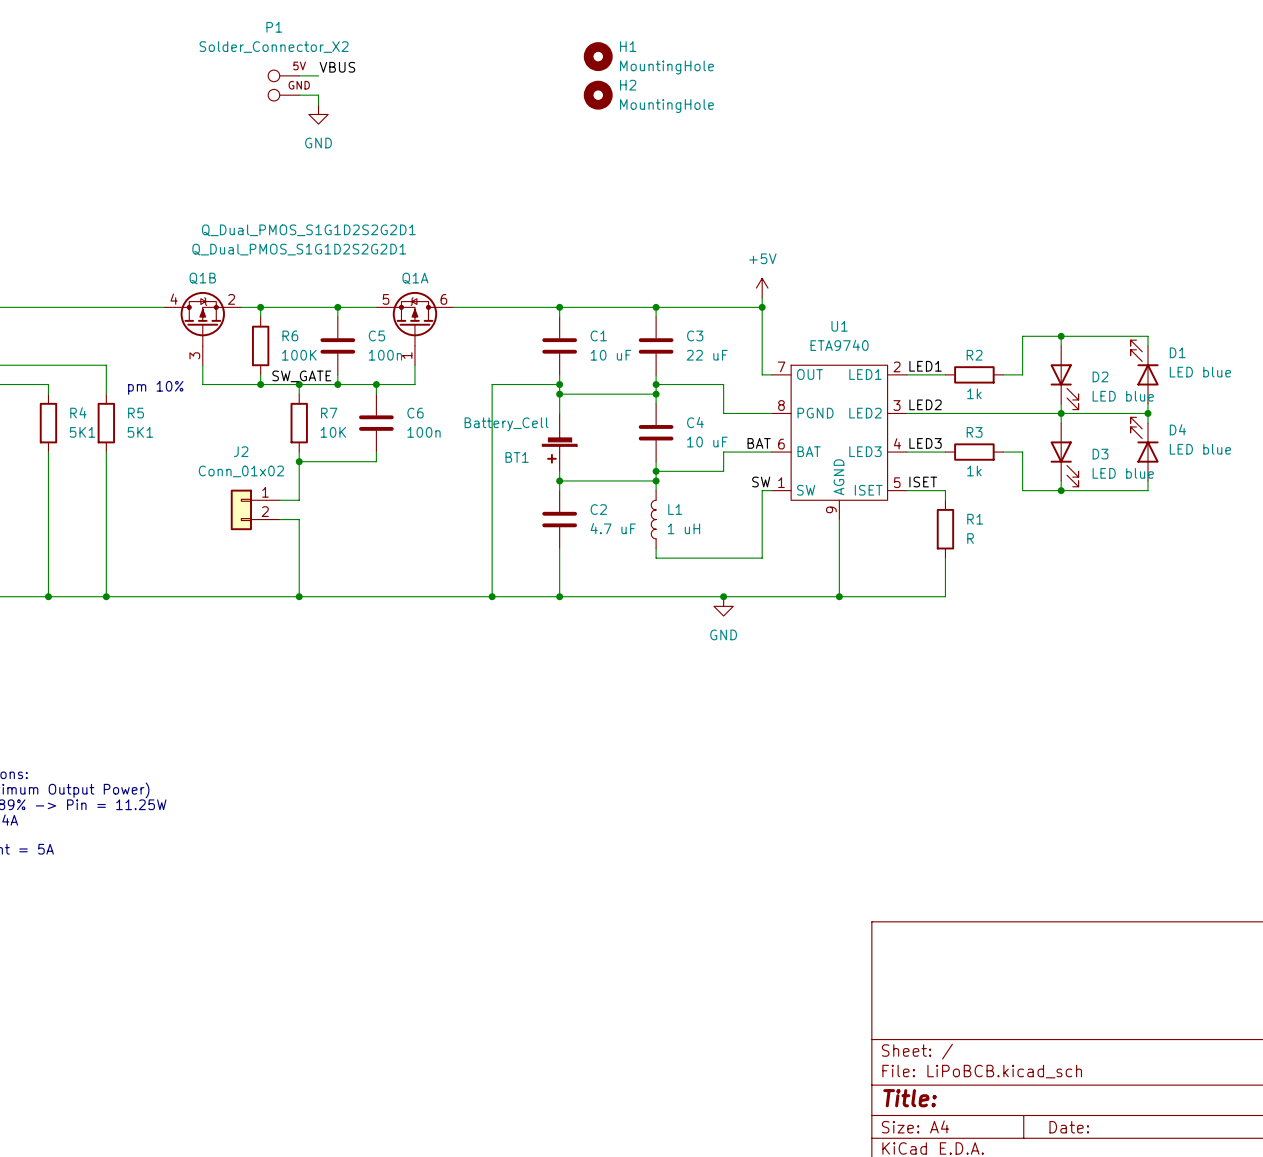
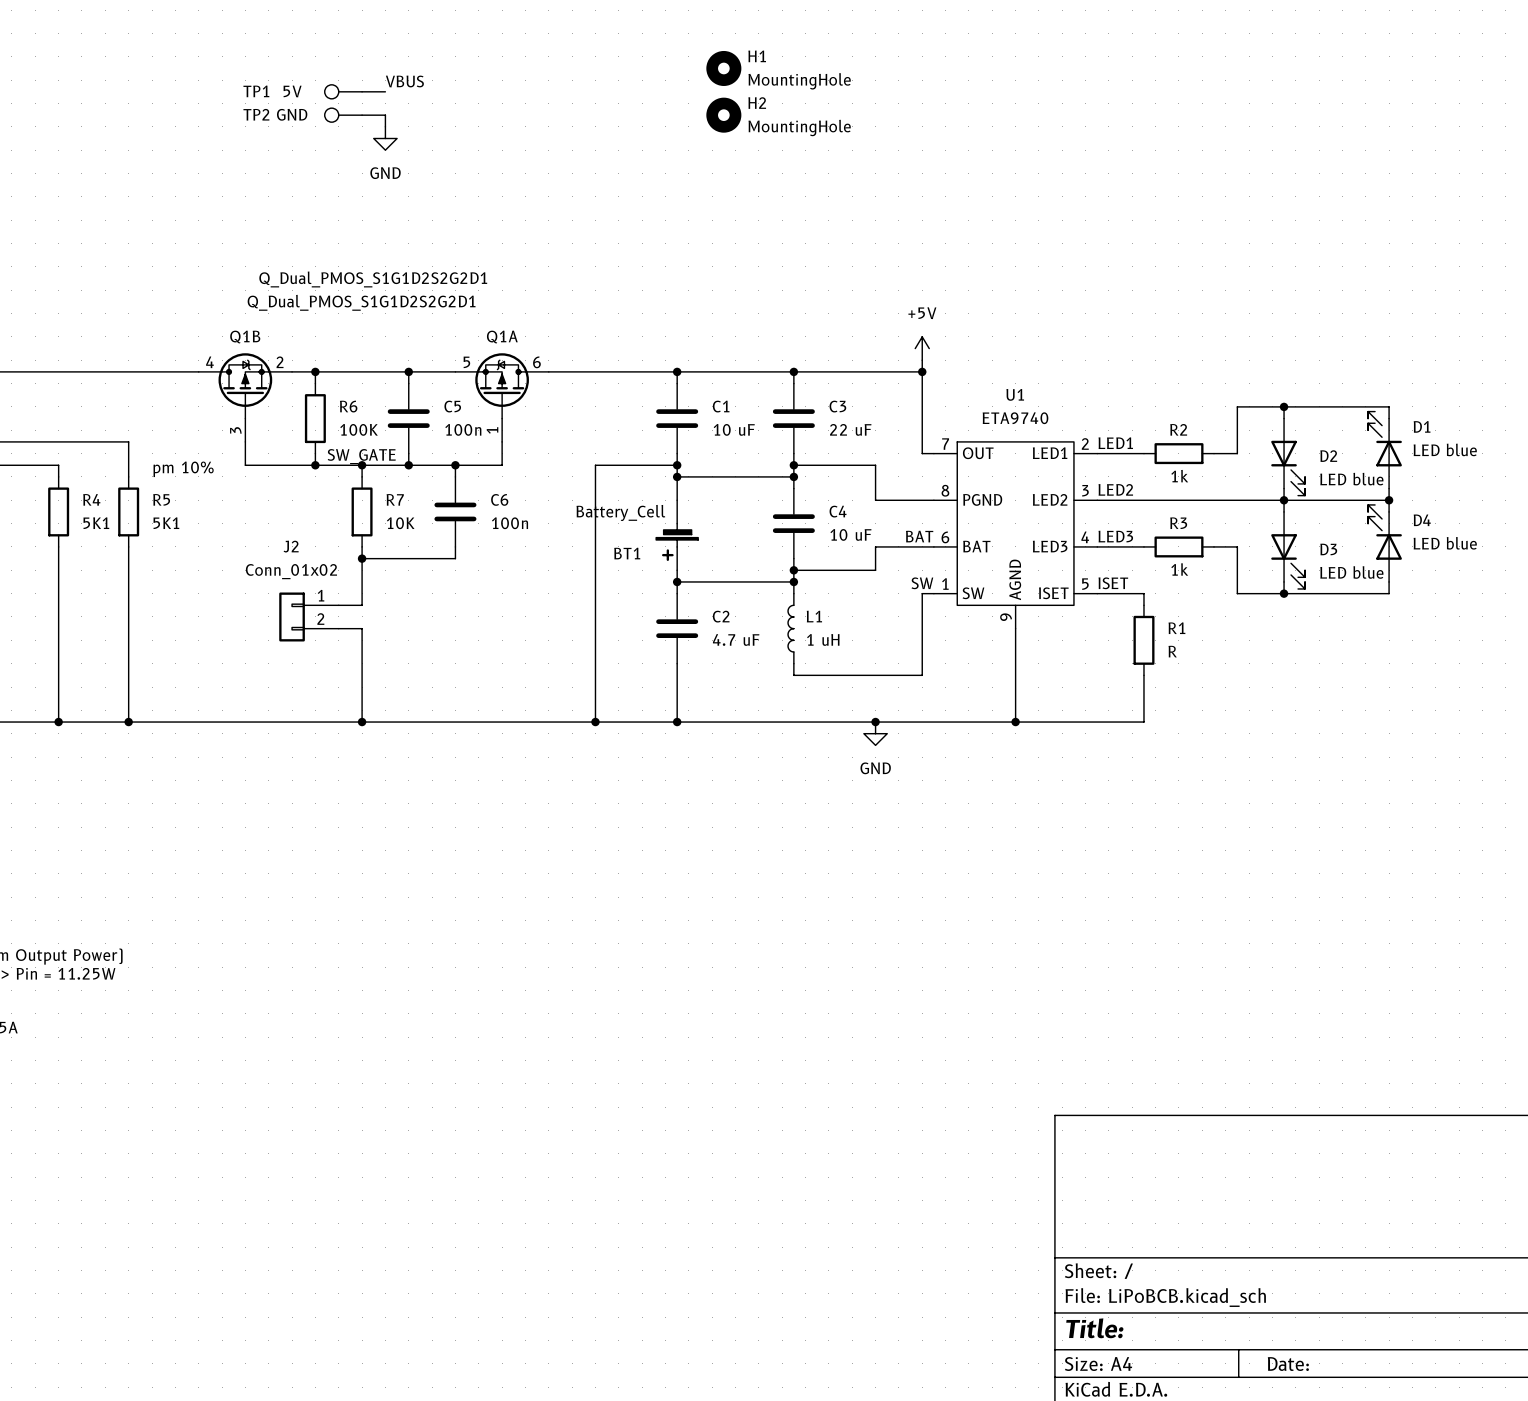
TP1: none -> 5V (343, 91)
P1: Solder_Connector_X2 (283, 85) -> none
TP2: none -> GND (343, 115)

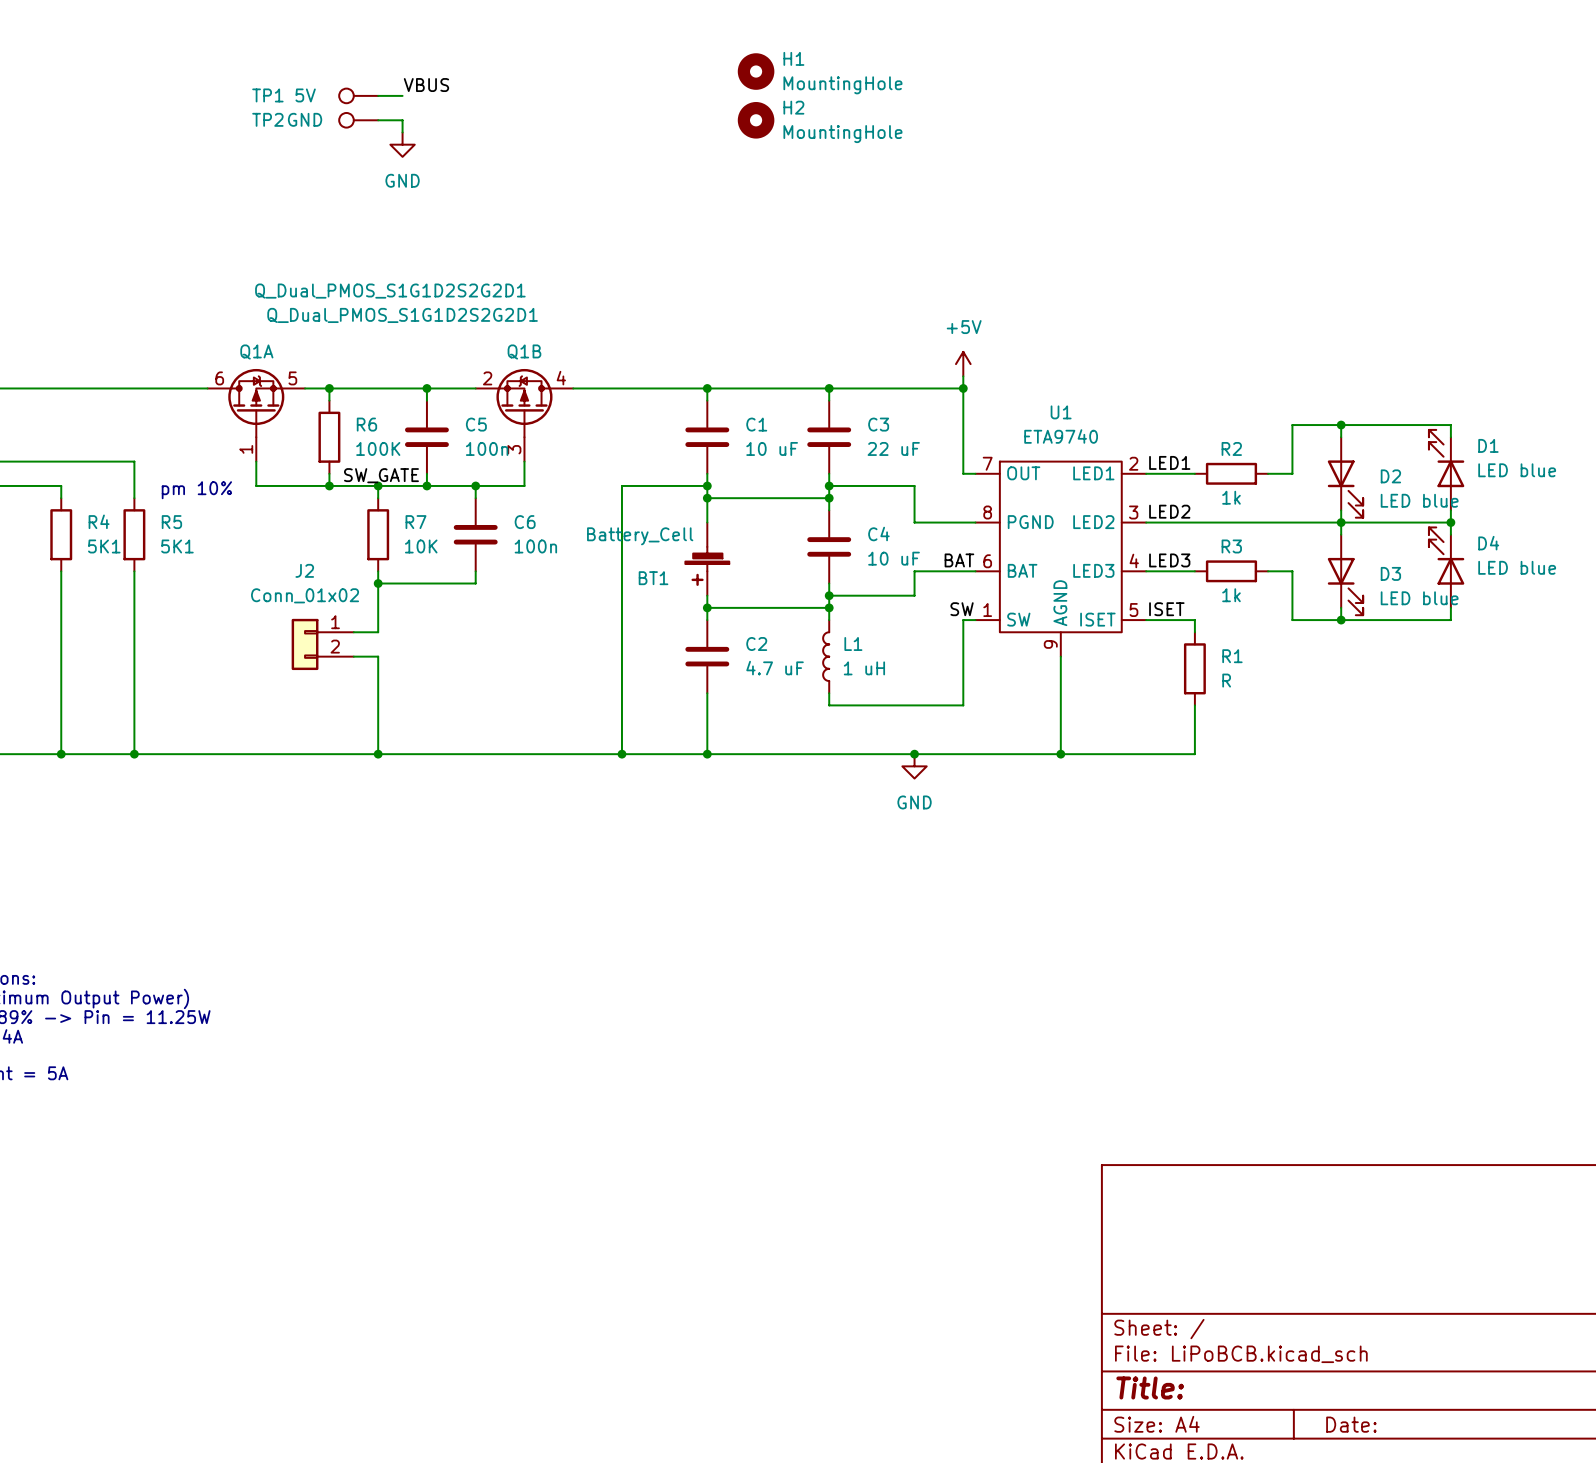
Q1B flip: as is (245, 385) -> left-right (524, 403)
Q1A flip: as is (502, 385) -> left-right (256, 403)
Q1B position: (245, 397) -> (524, 415)
Q1A position: (502, 397) -> (256, 415)

